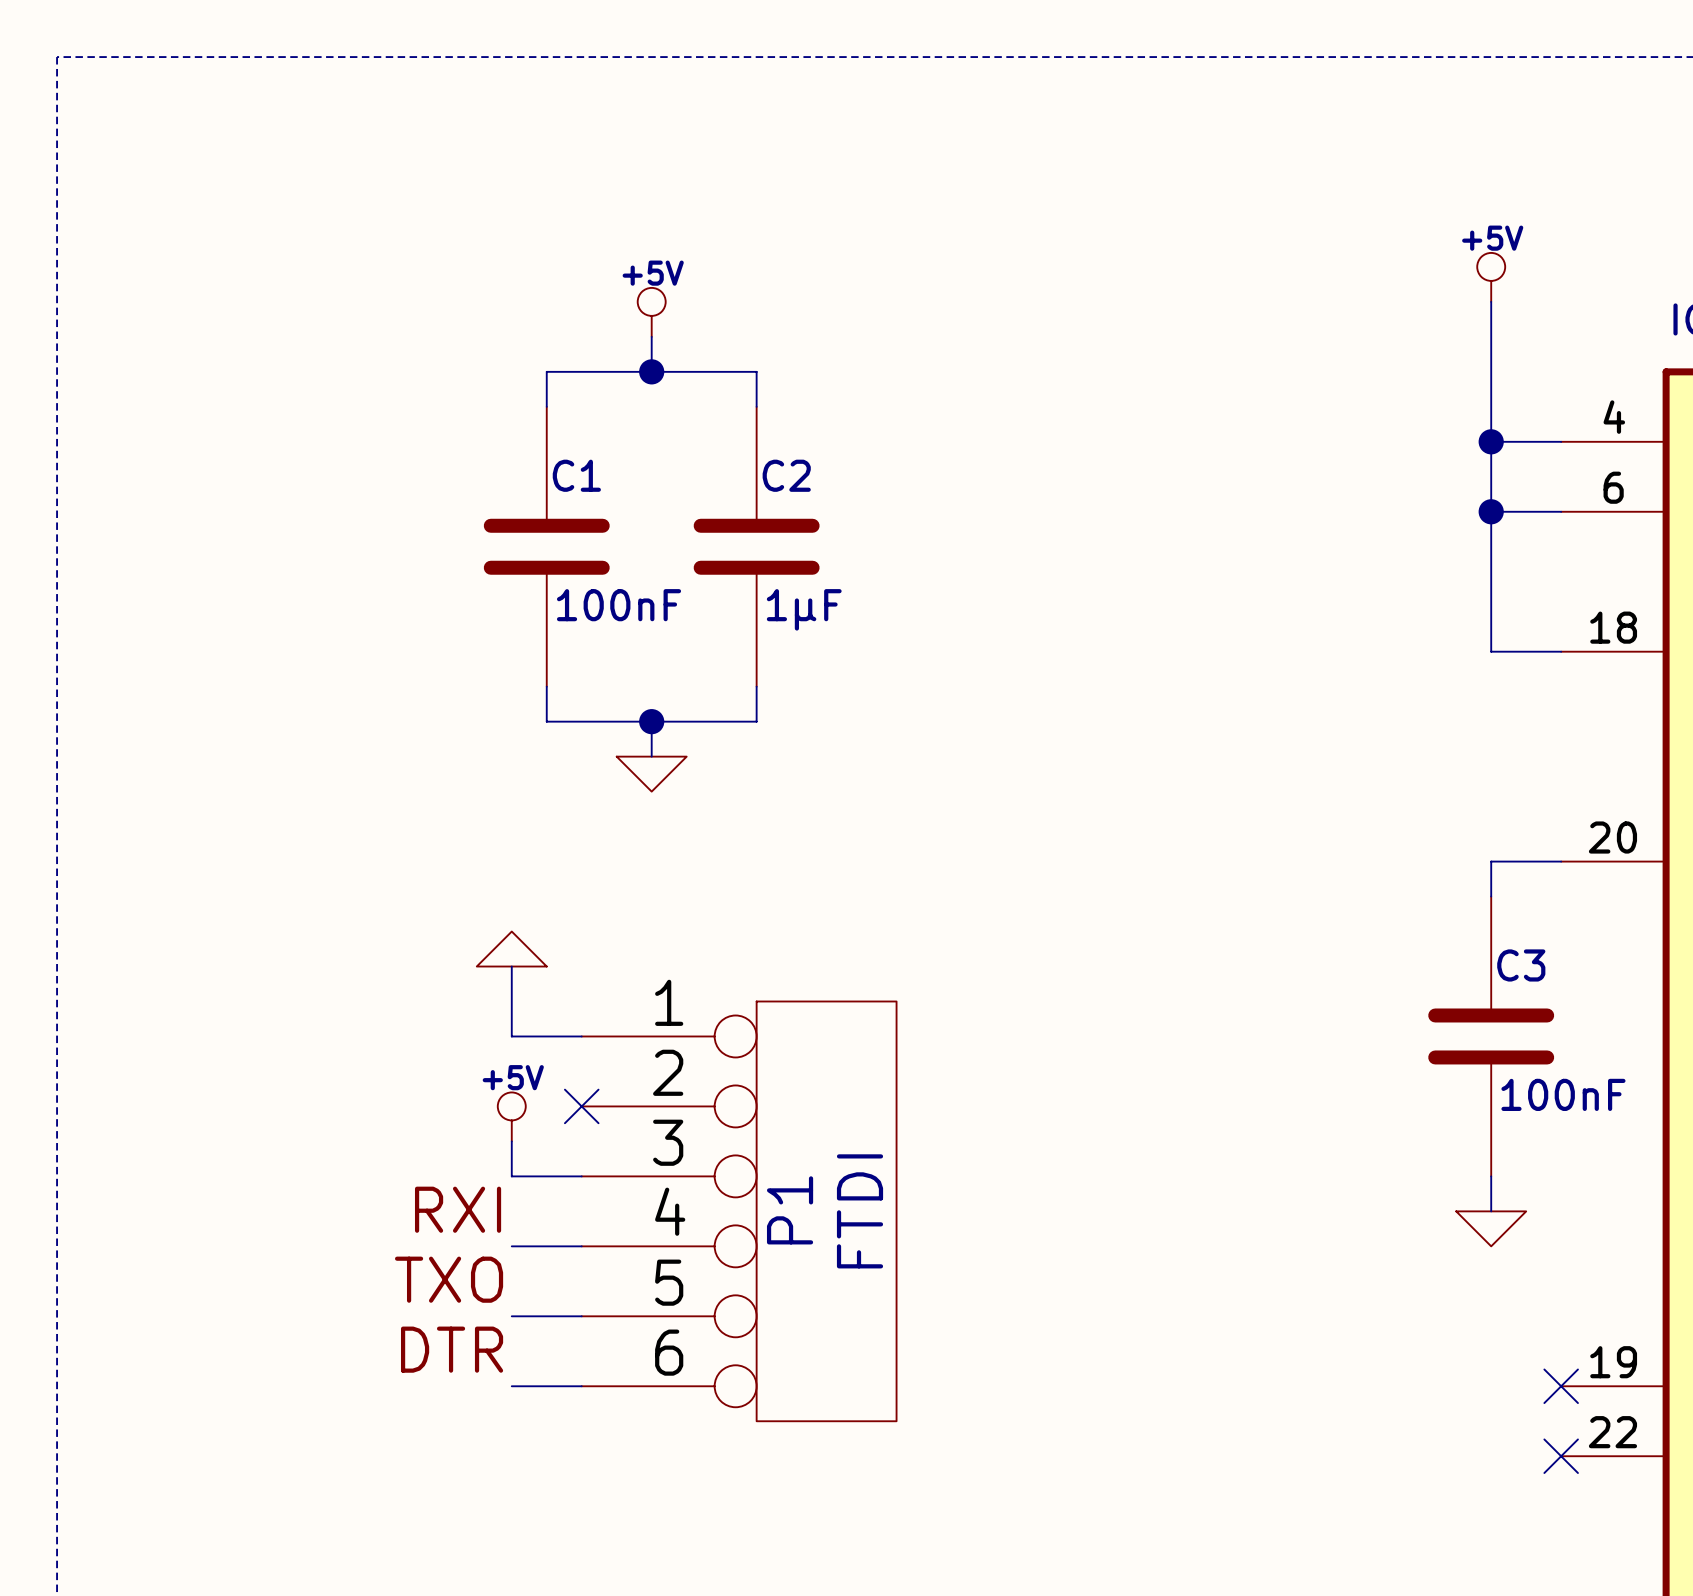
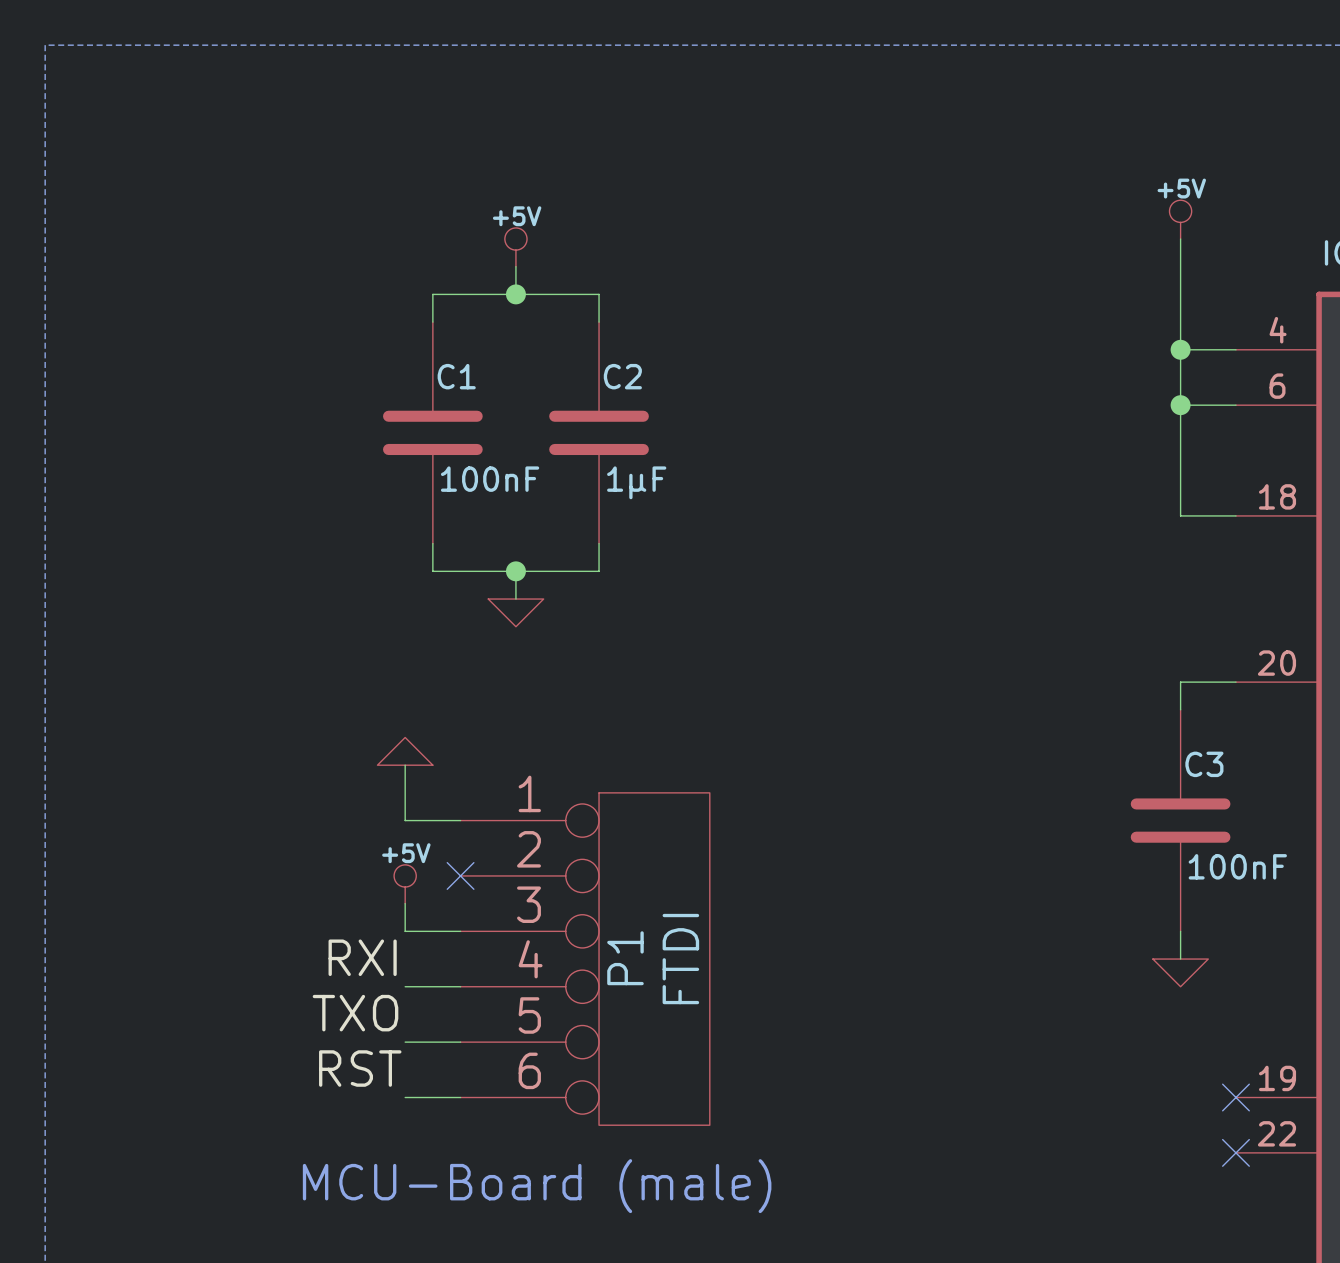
label: DTR (452, 1349) -> RST (360, 1068)
text: none -> MCU-Board (male) (537, 1186)

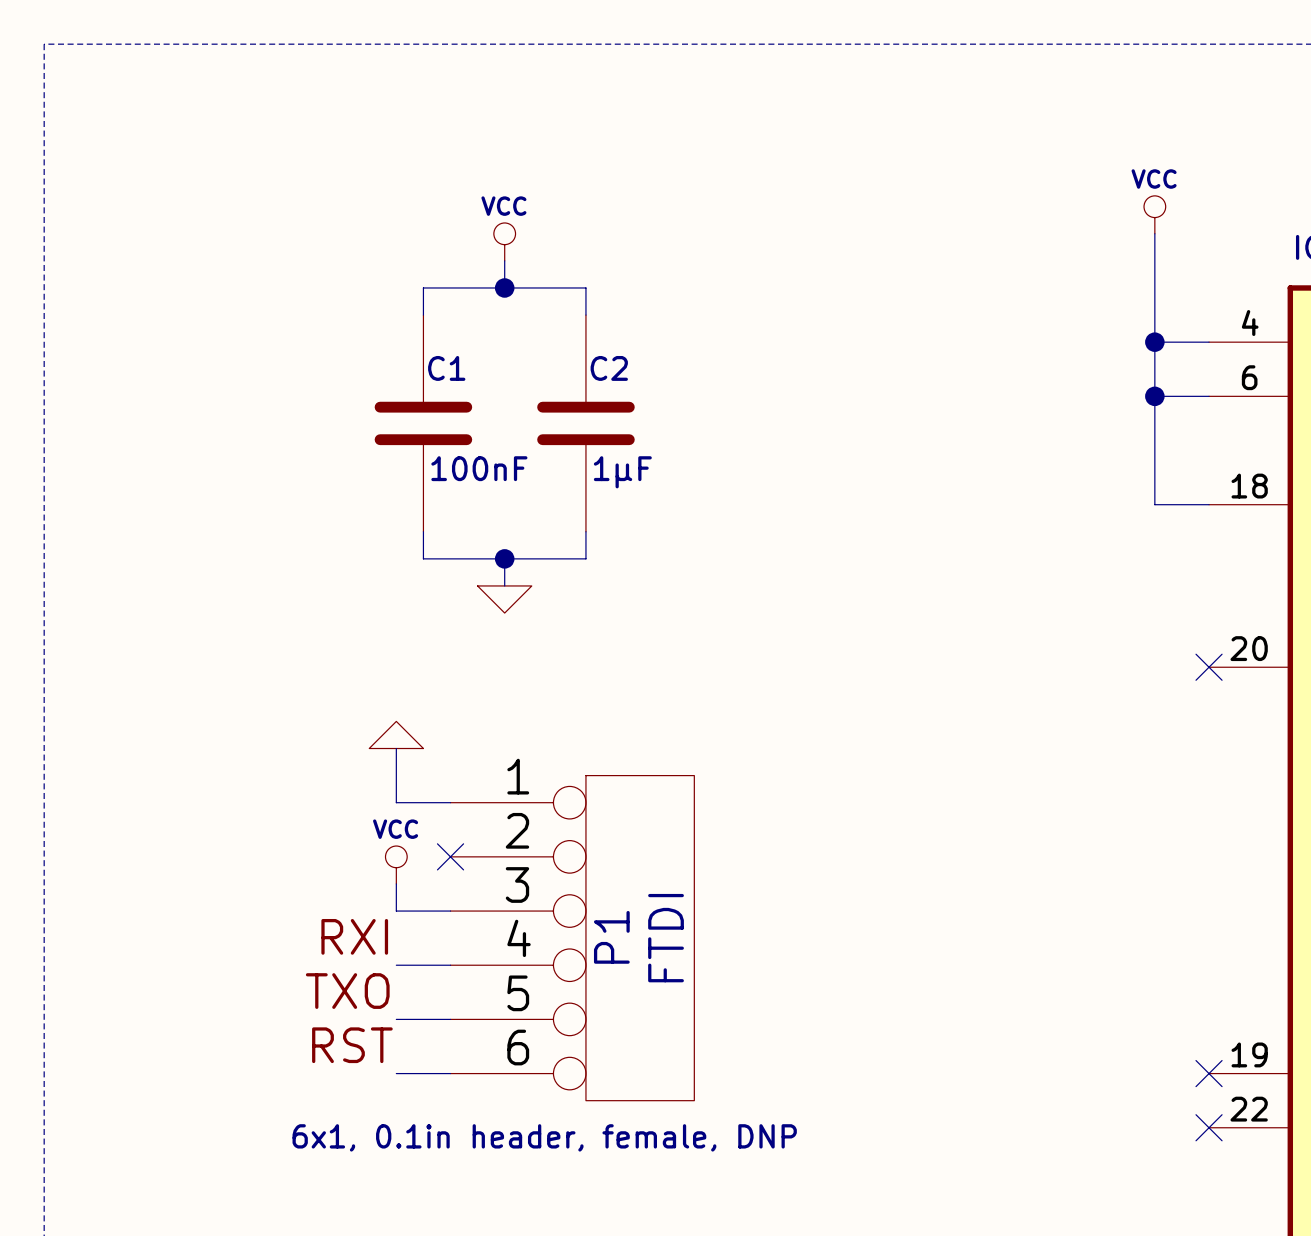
power symbol: +5V (1180, 219) -> VCC (1154, 214)
power symbol: +5V (515, 247) -> VCC (504, 241)
wire: (1235, 682) (1180, 682) (1180, 709) -> none
no-connect mark: none -> (1209, 667)
C3: 100nF (1180, 820) -> none
power symbol: +5V (405, 884) -> VCC (396, 864)
wire: (1180, 931) (1180, 959) -> none
power symbol: (1180, 972) -> none
text: none -> 6x1, 0.1in header, female, DNP (544, 1137)
text: MCU-Board (male) (537, 1186) -> none

